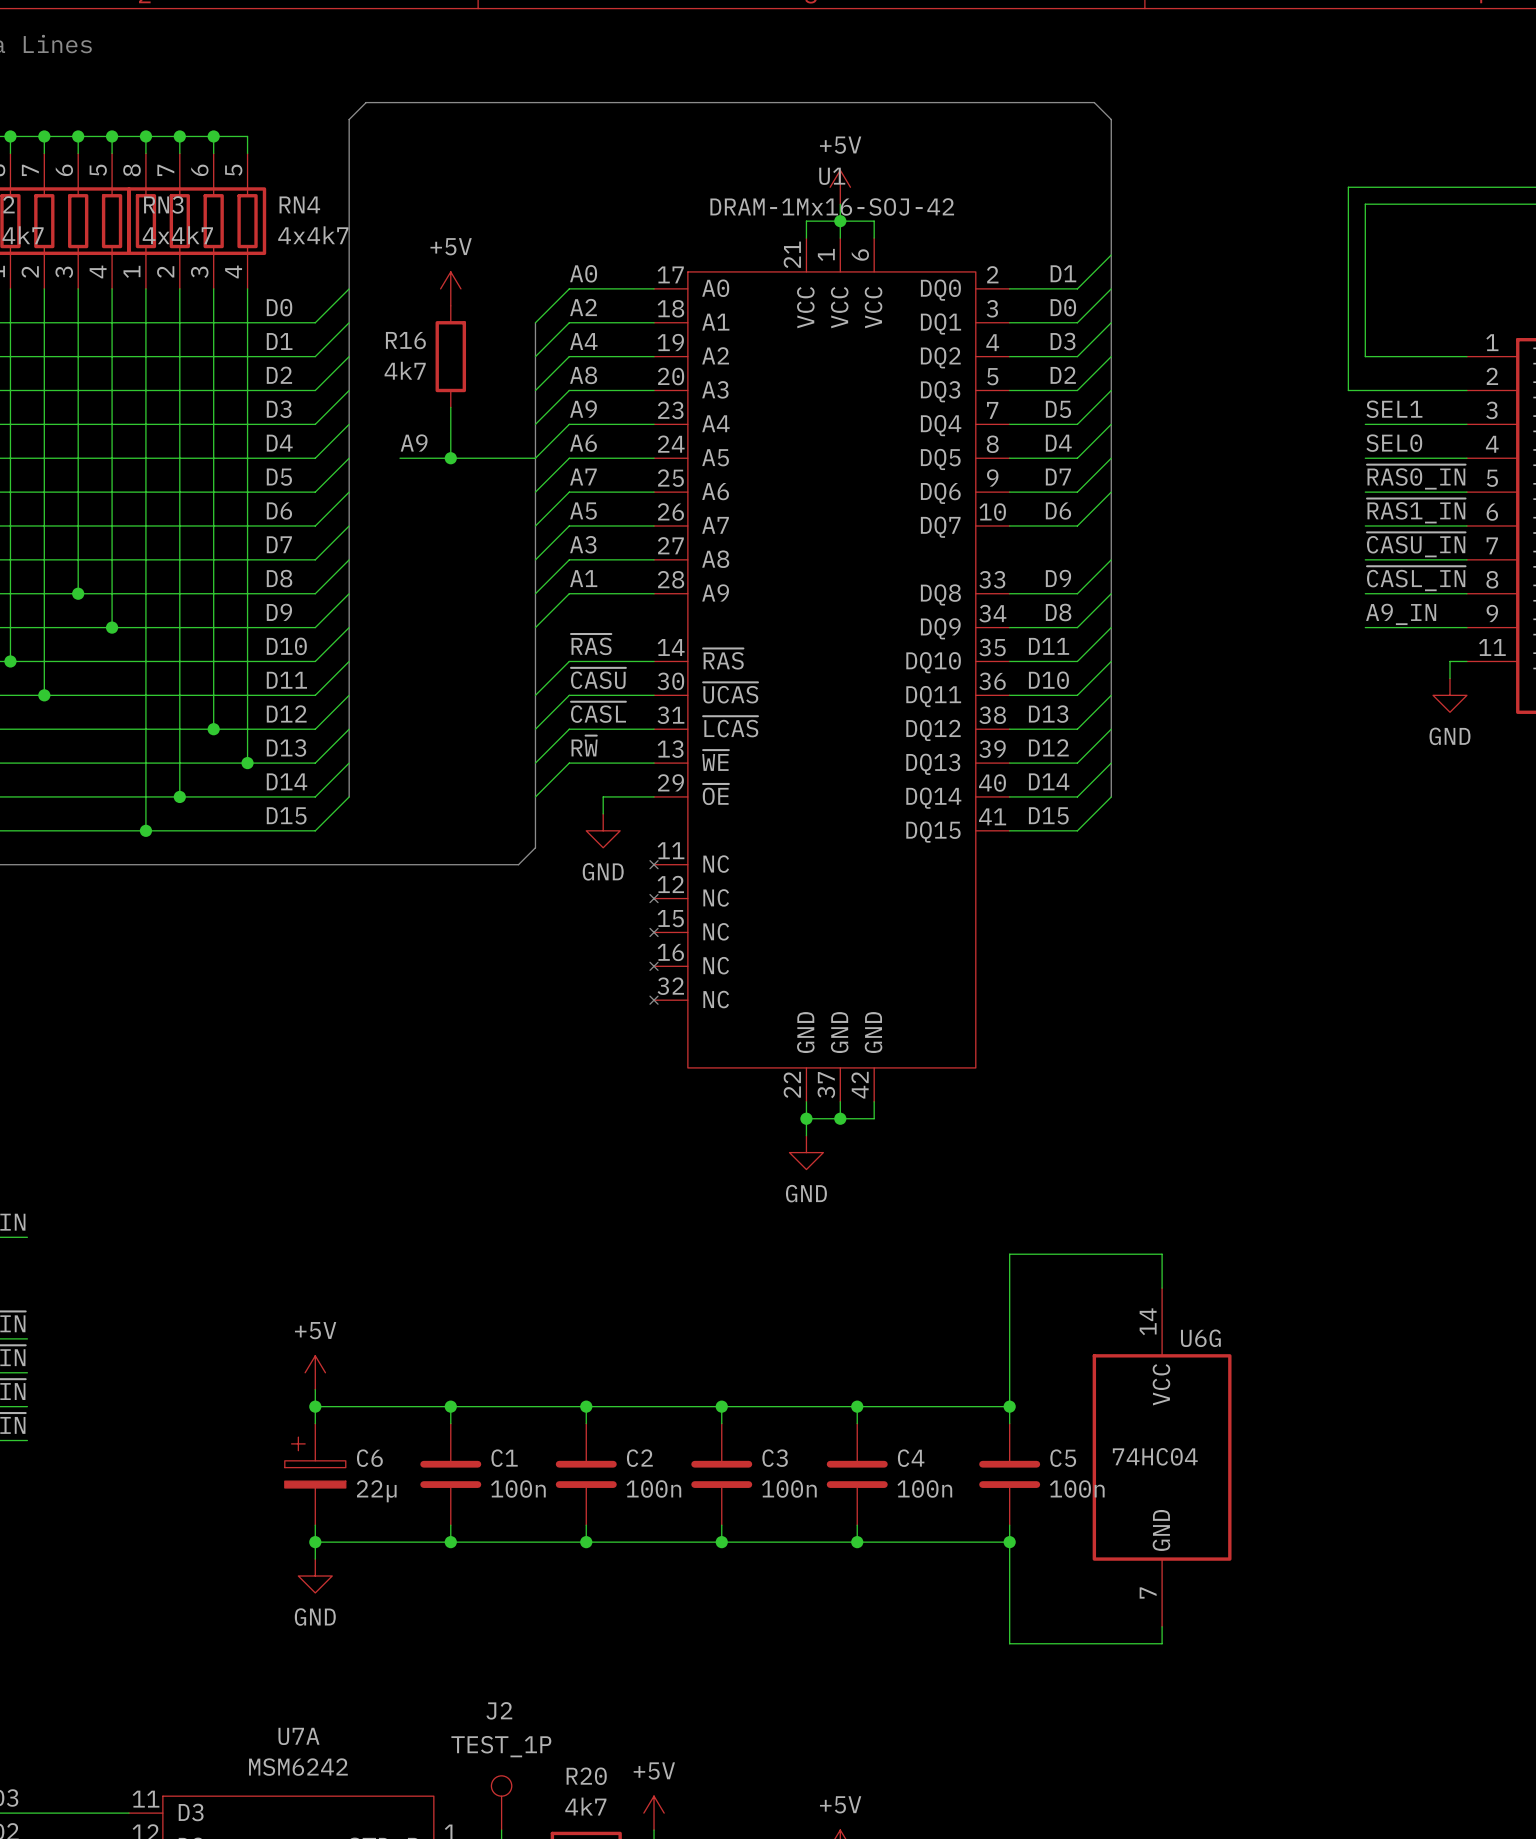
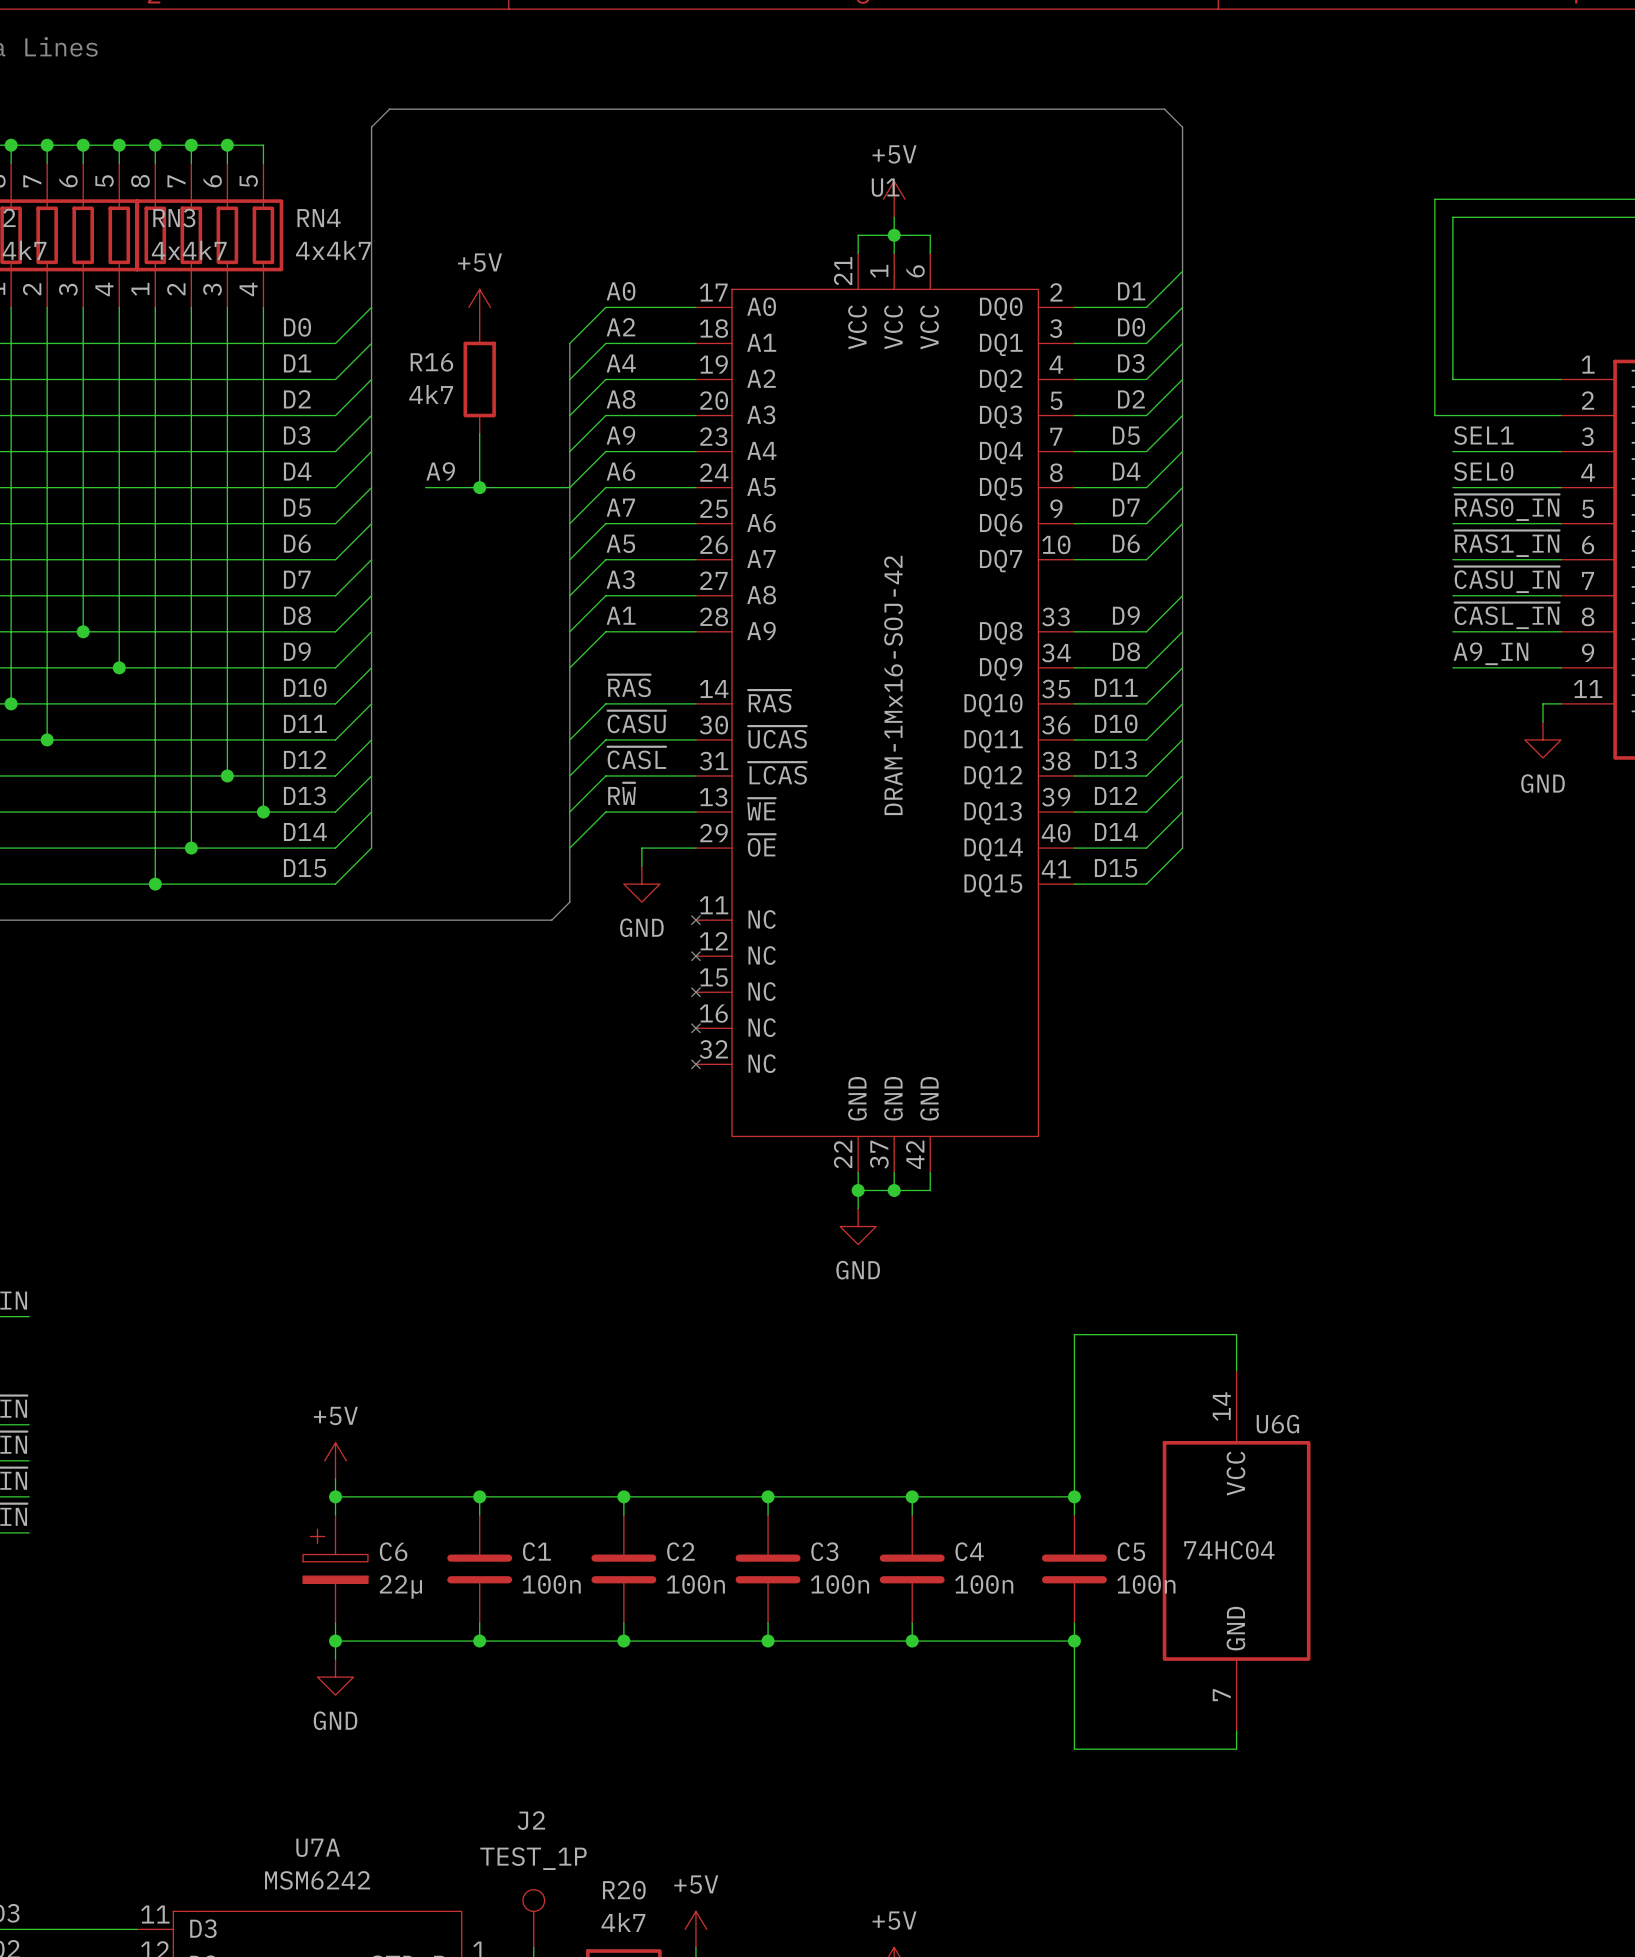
U1 value rotation: 0° (832, 206) -> 90° counterclockwise (893, 685)
U1 value position: DRAM-1Mx16-SOJ-42 (832, 206) -> DRAM-1Mx16-SOJ-42 (893, 685)

